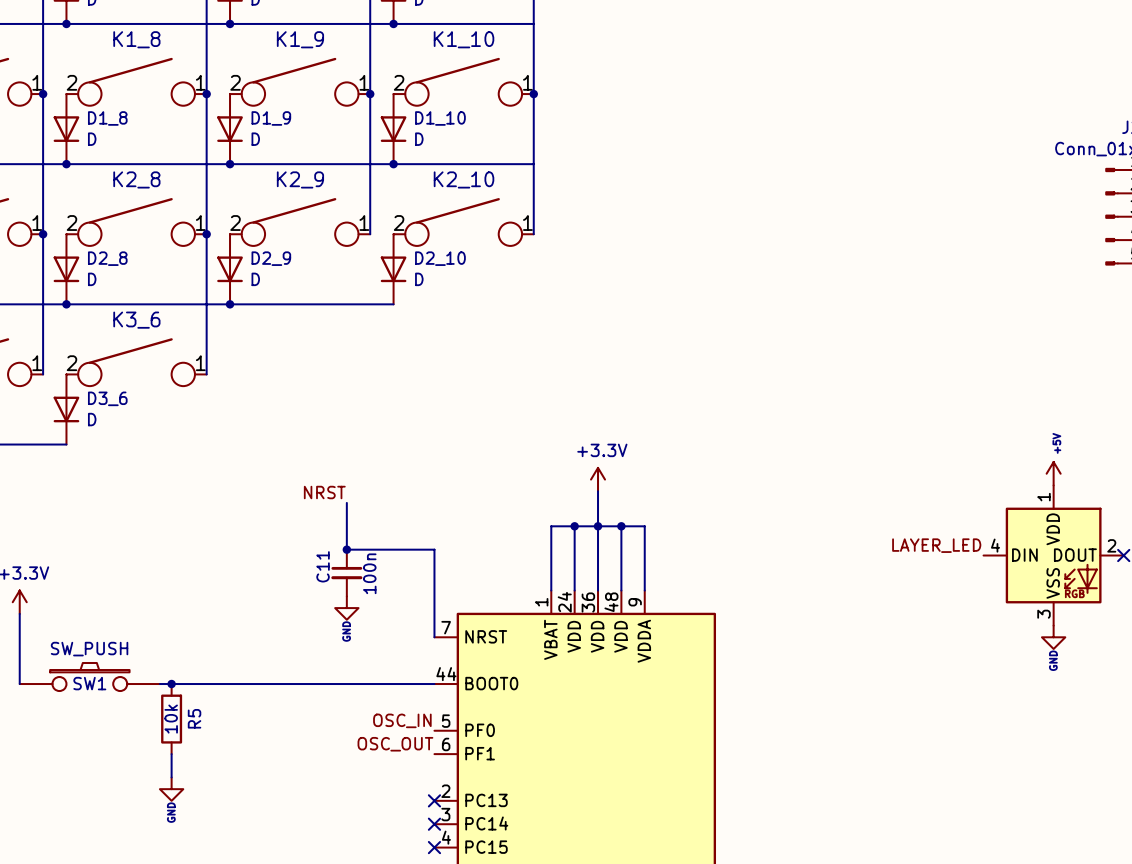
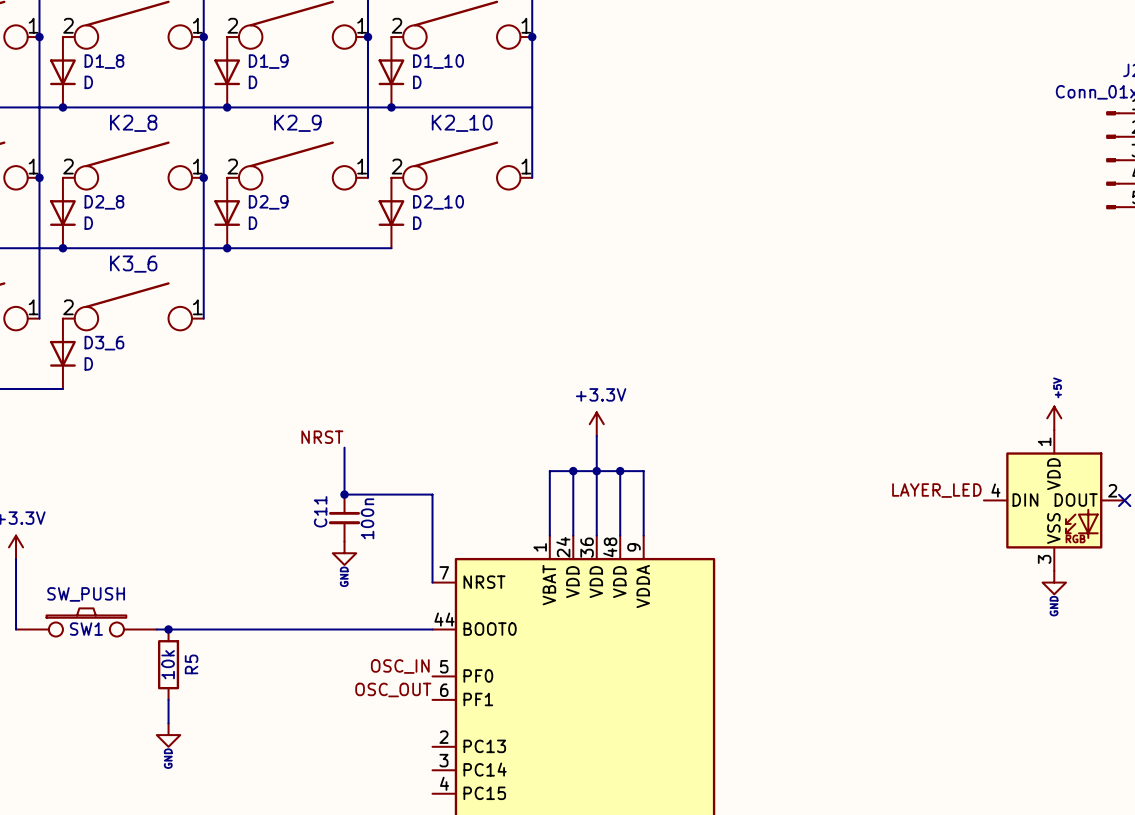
no-connect mark: (434, 800) -> none
no-connect mark: (434, 824) -> none
no-connect mark: (434, 847) -> none

